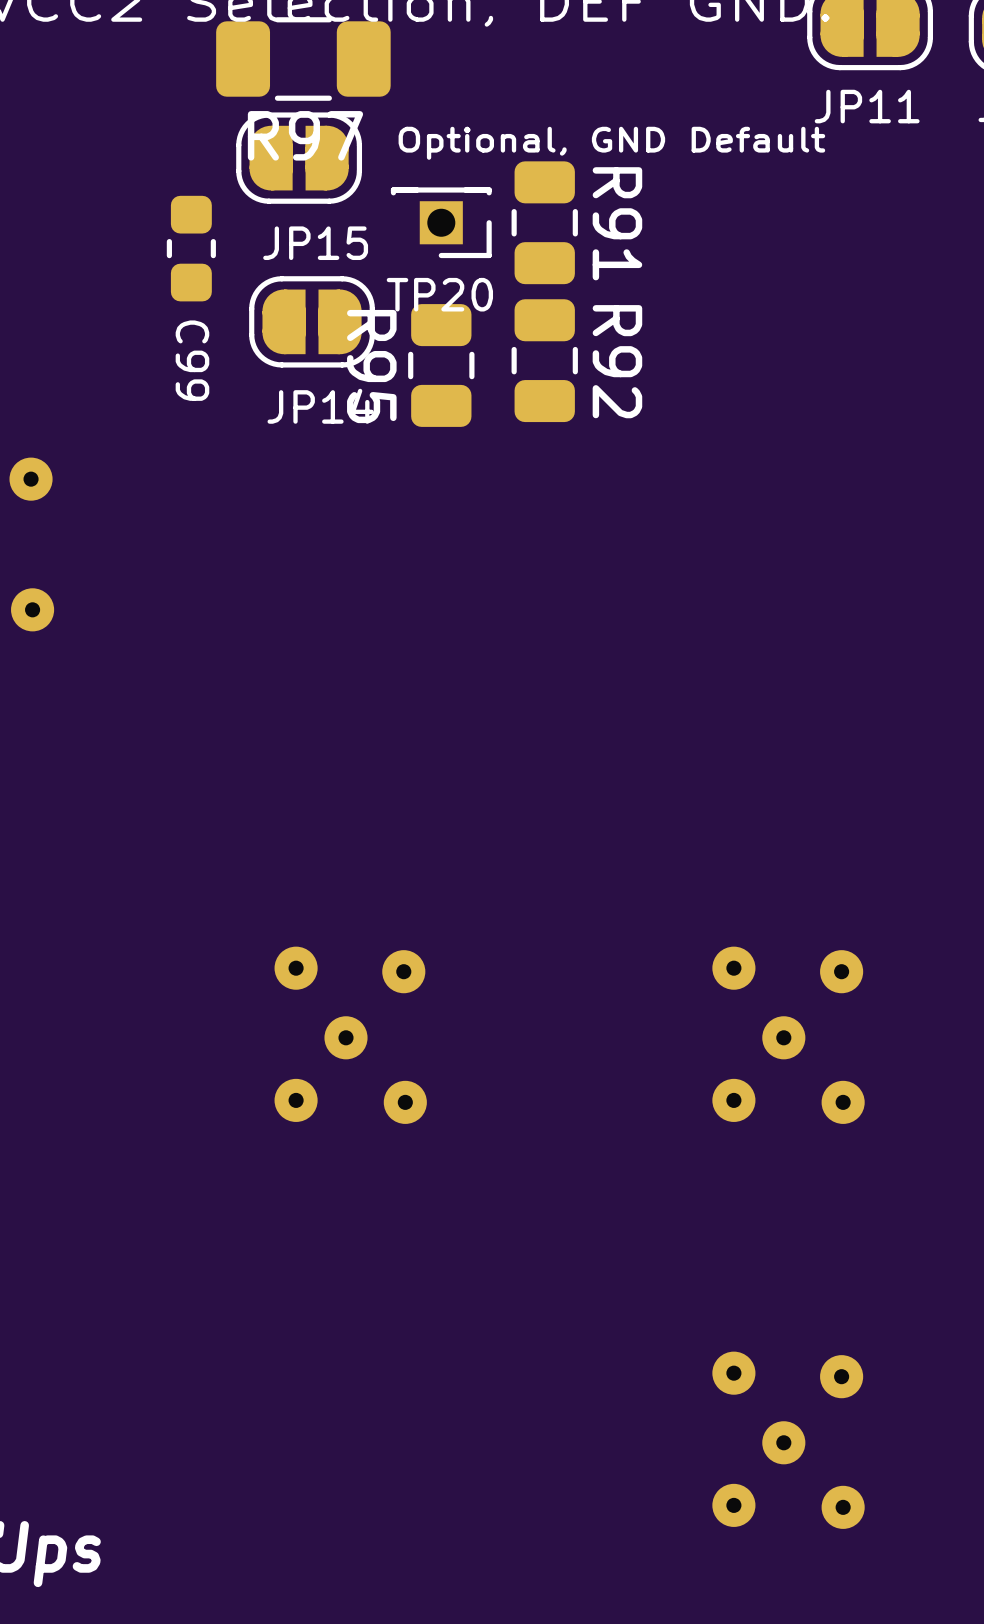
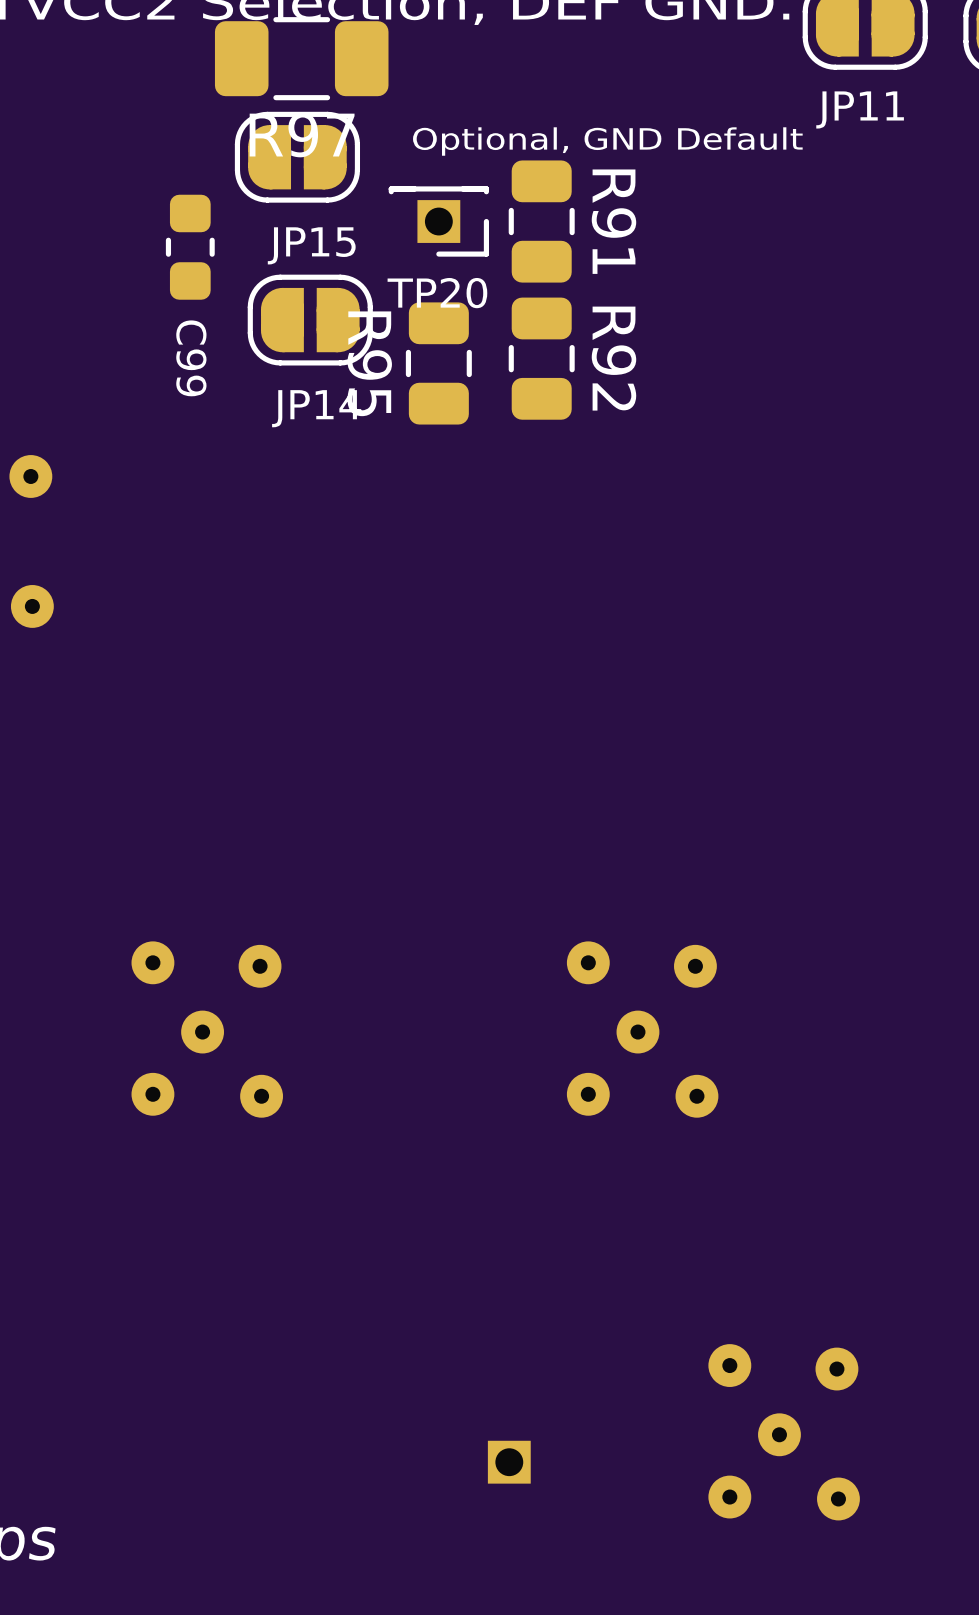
part position: (350, 1035) -> (207, 1029)
part position: (788, 1035) -> (642, 1029)
part: none -> (509, 1462)

